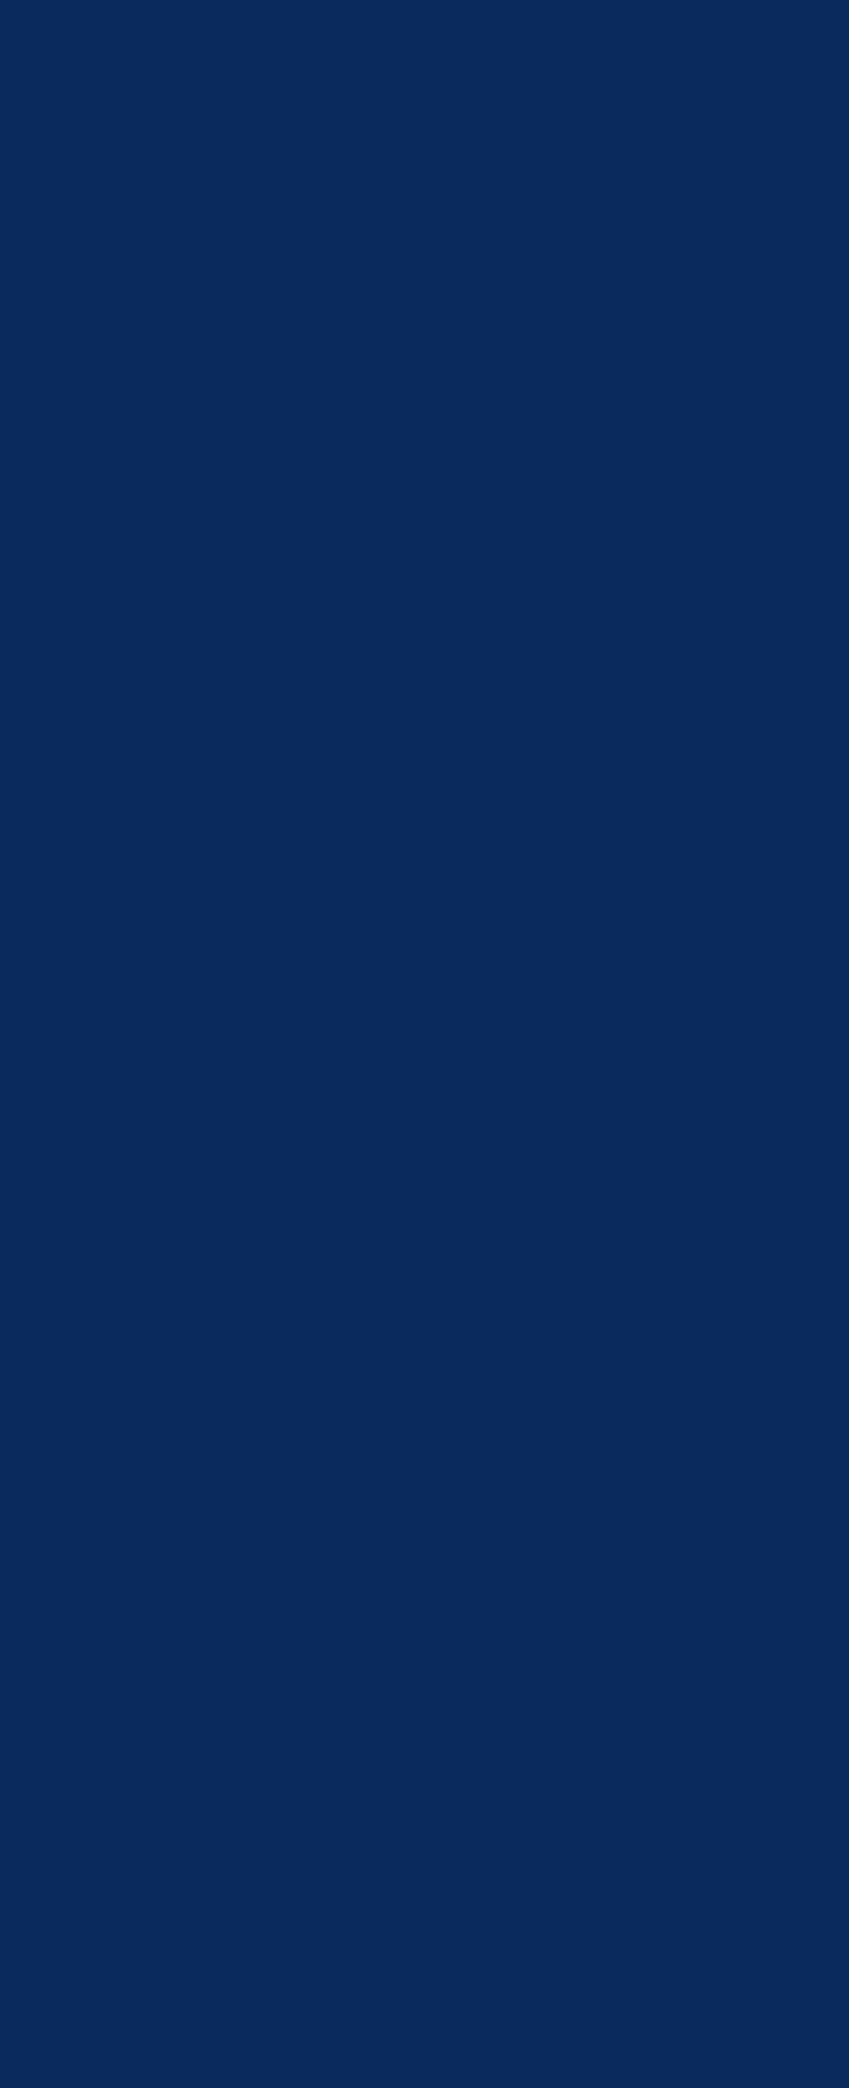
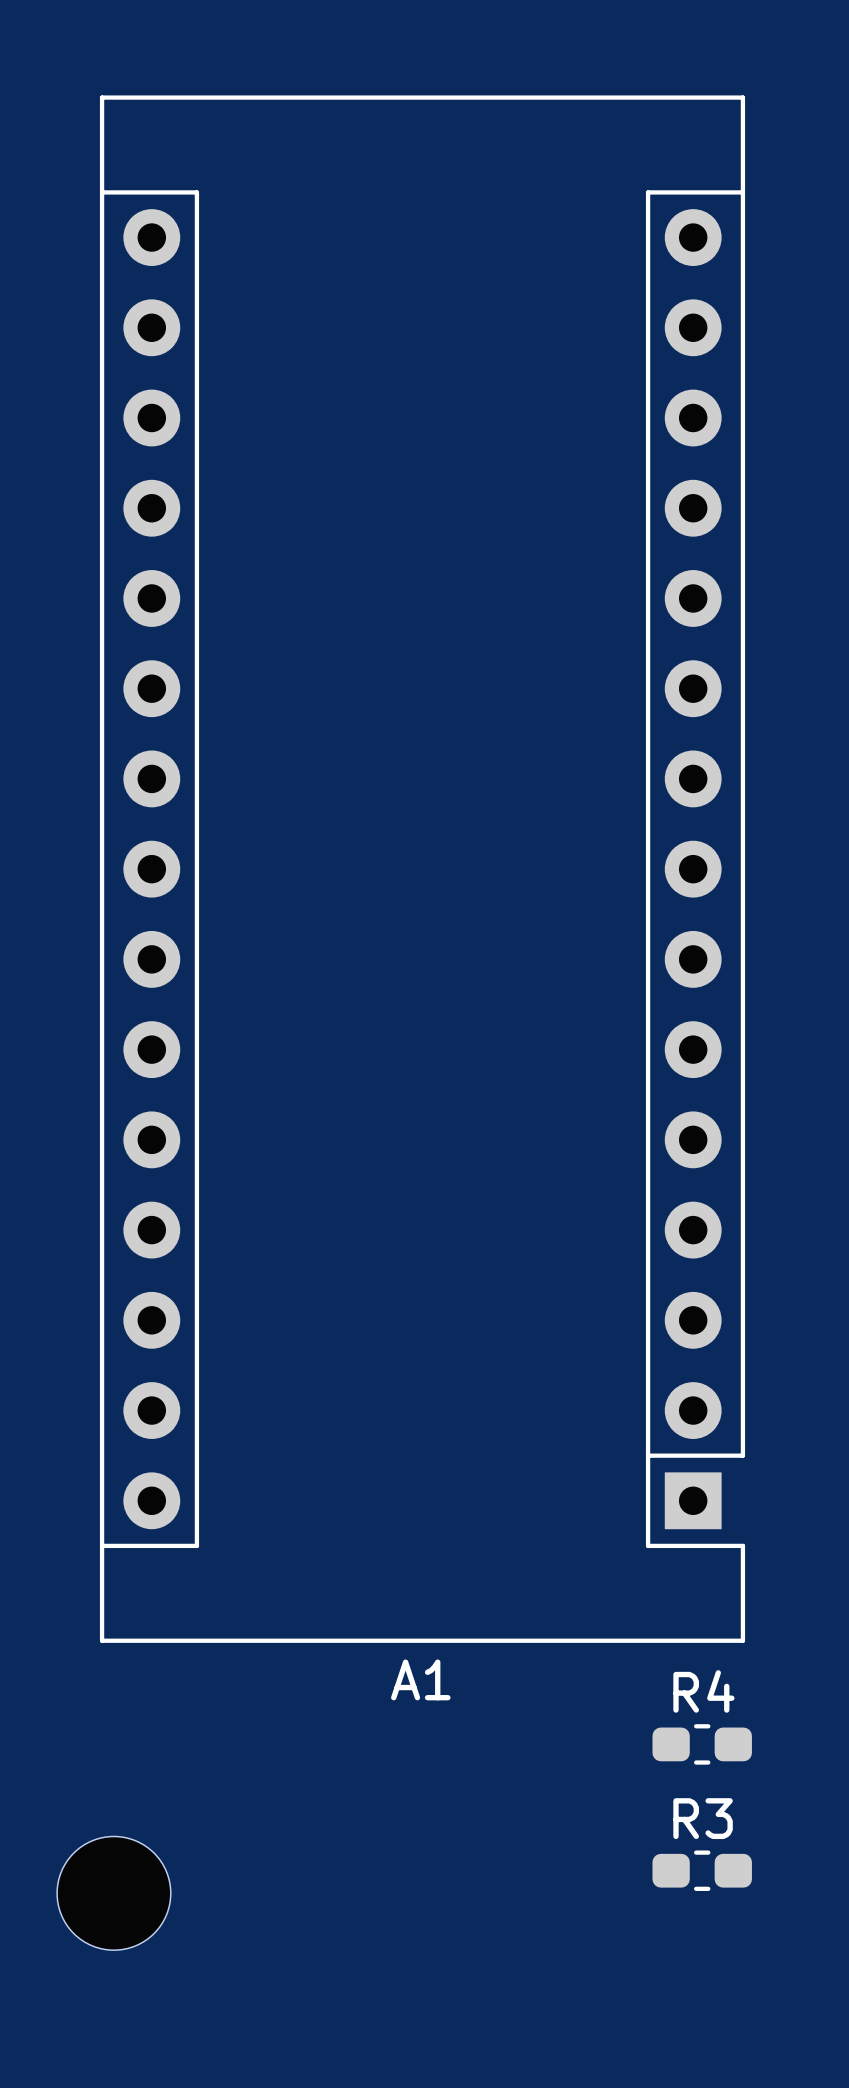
A1: none -> (422, 869)
R4: none -> (702, 1744)
R3: none -> (702, 1870)
part: none -> (113, 1893)

